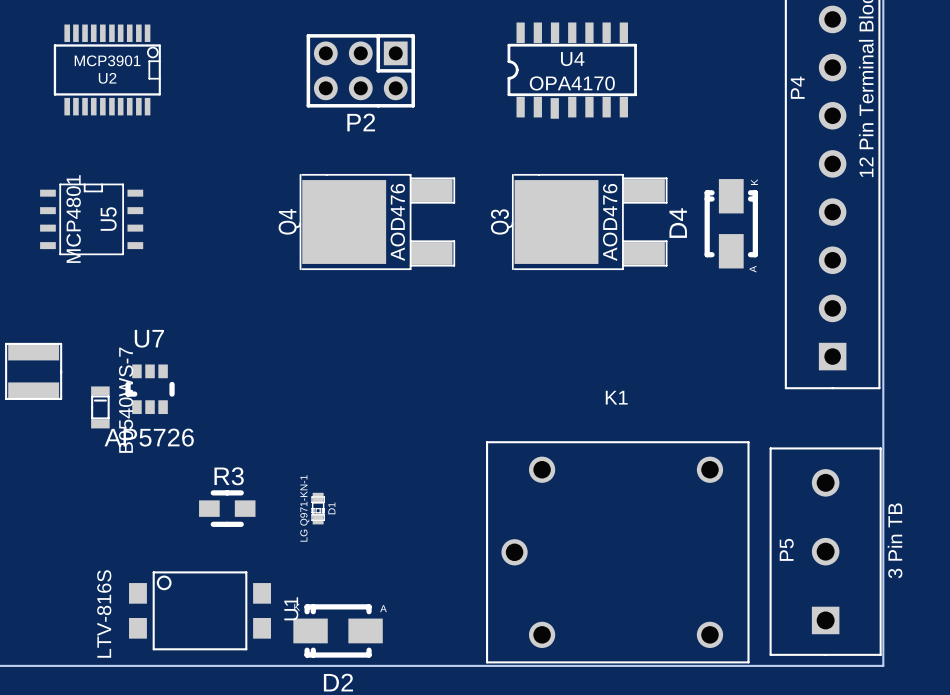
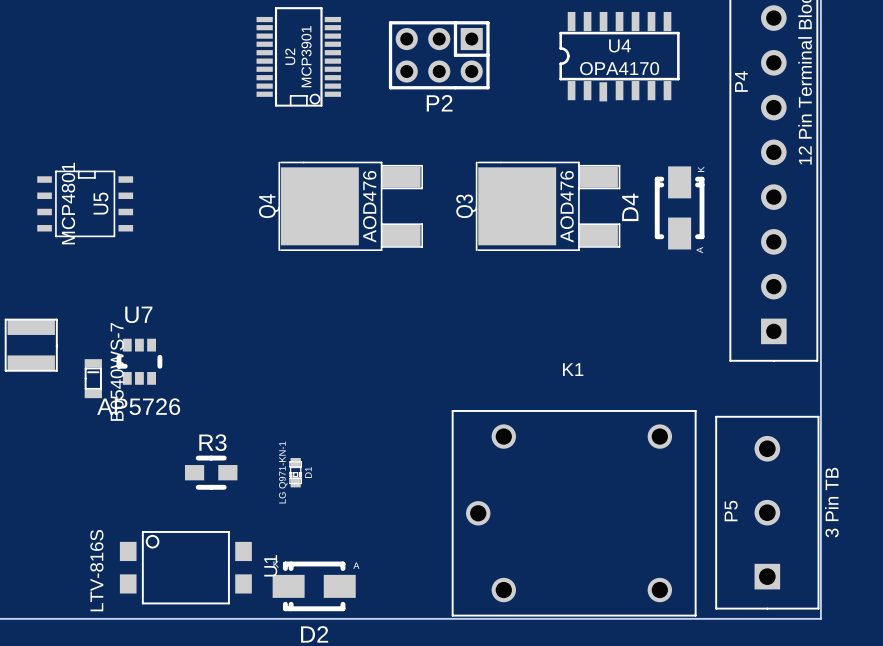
U2 rotation: 0° (107, 69) -> 90° clockwise (298, 56)
U2 position: (107, 69) -> (298, 56)
P2 position: (360, 70) -> (439, 55)
U4 position: (572, 70) -> (619, 56)

